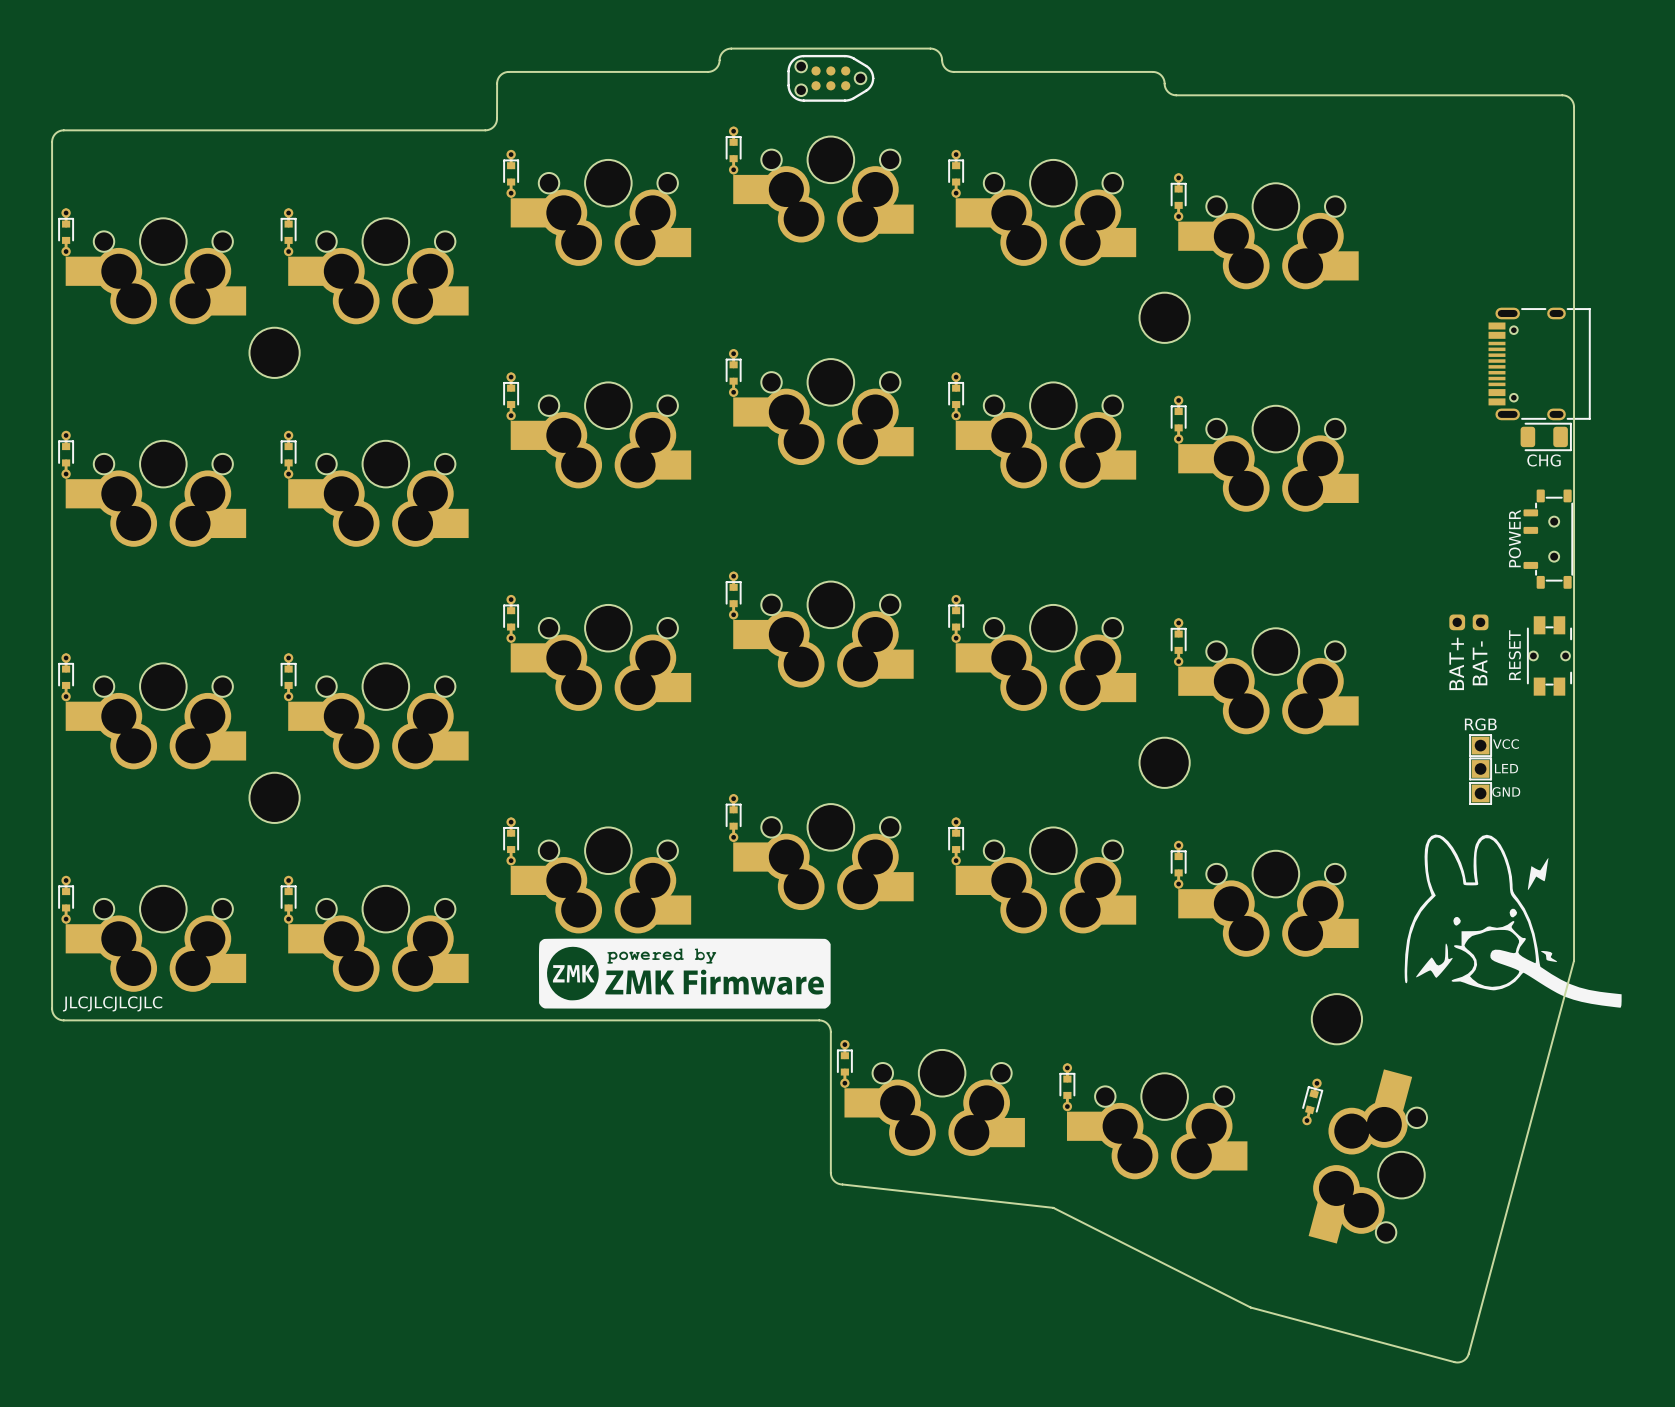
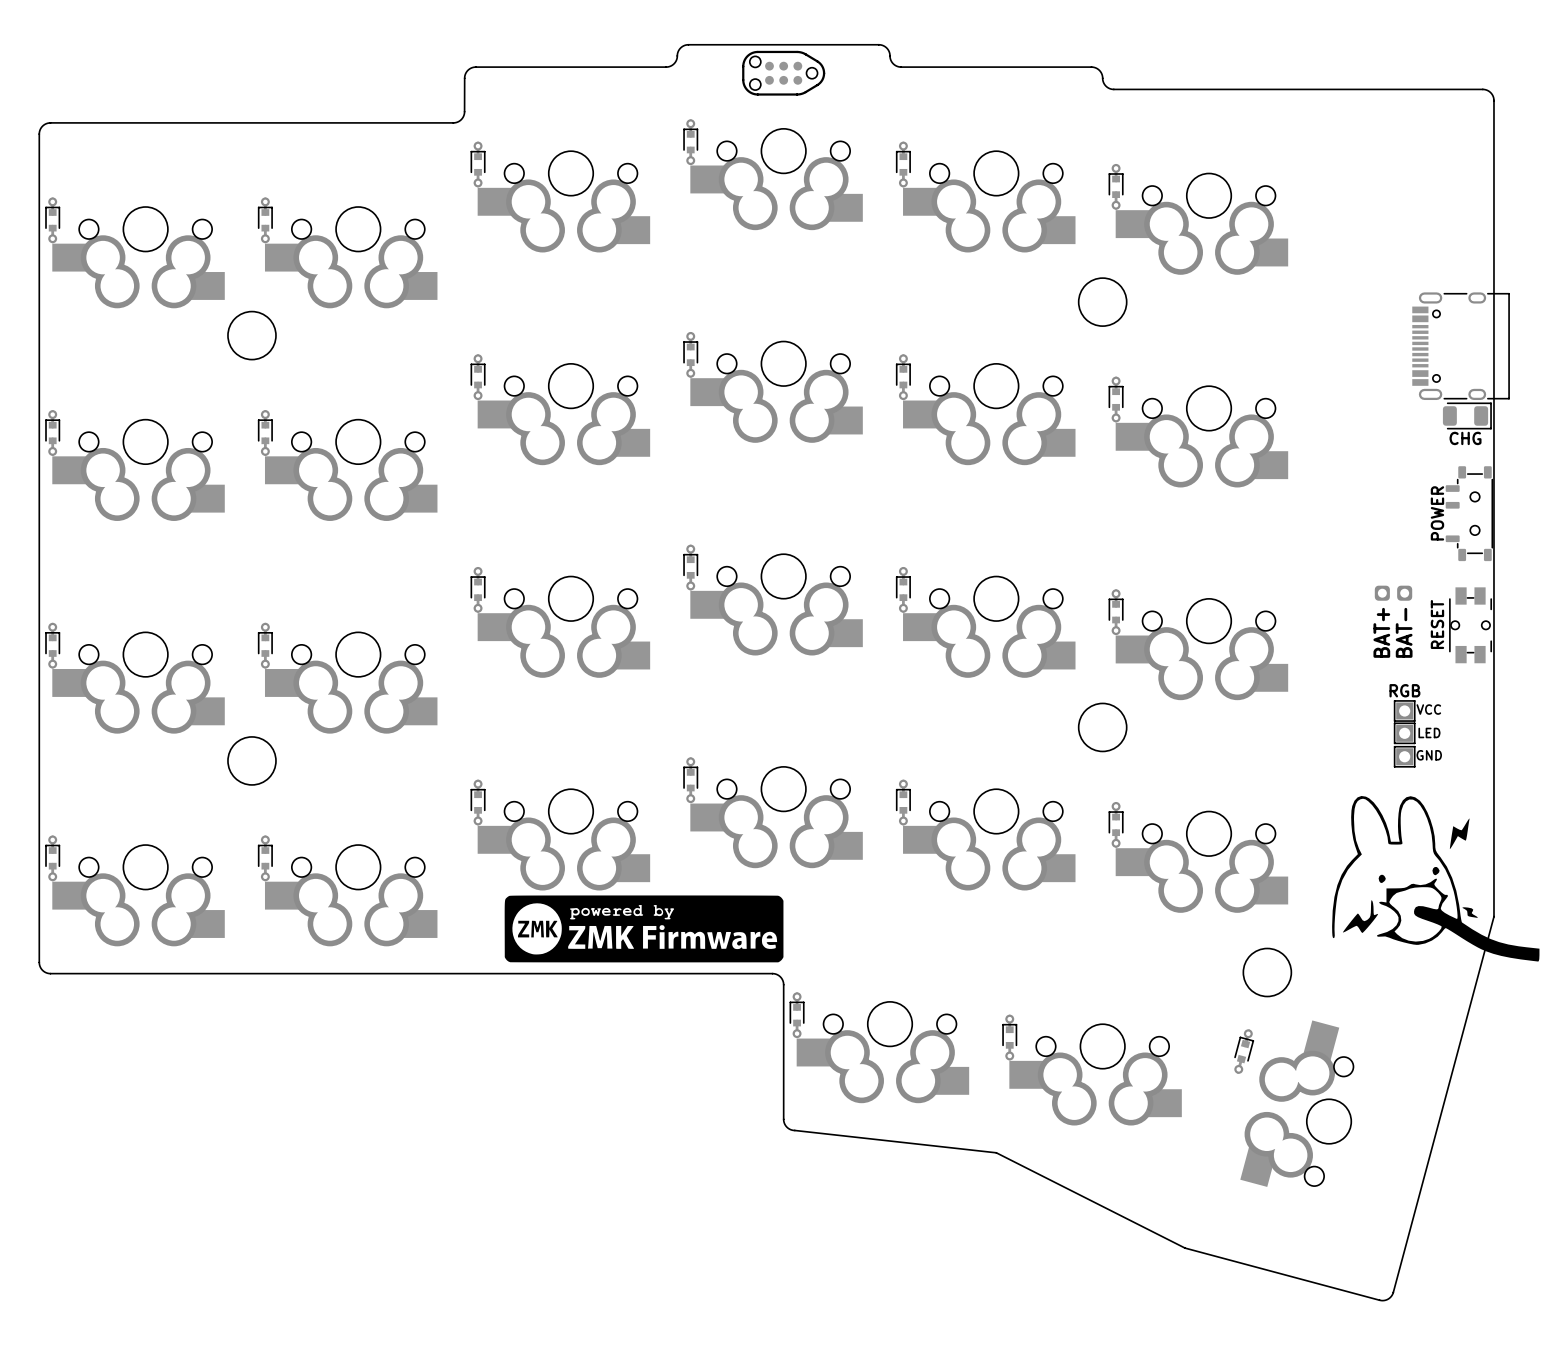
text: JLCJLCJLCJLC (112, 1003) -> none

